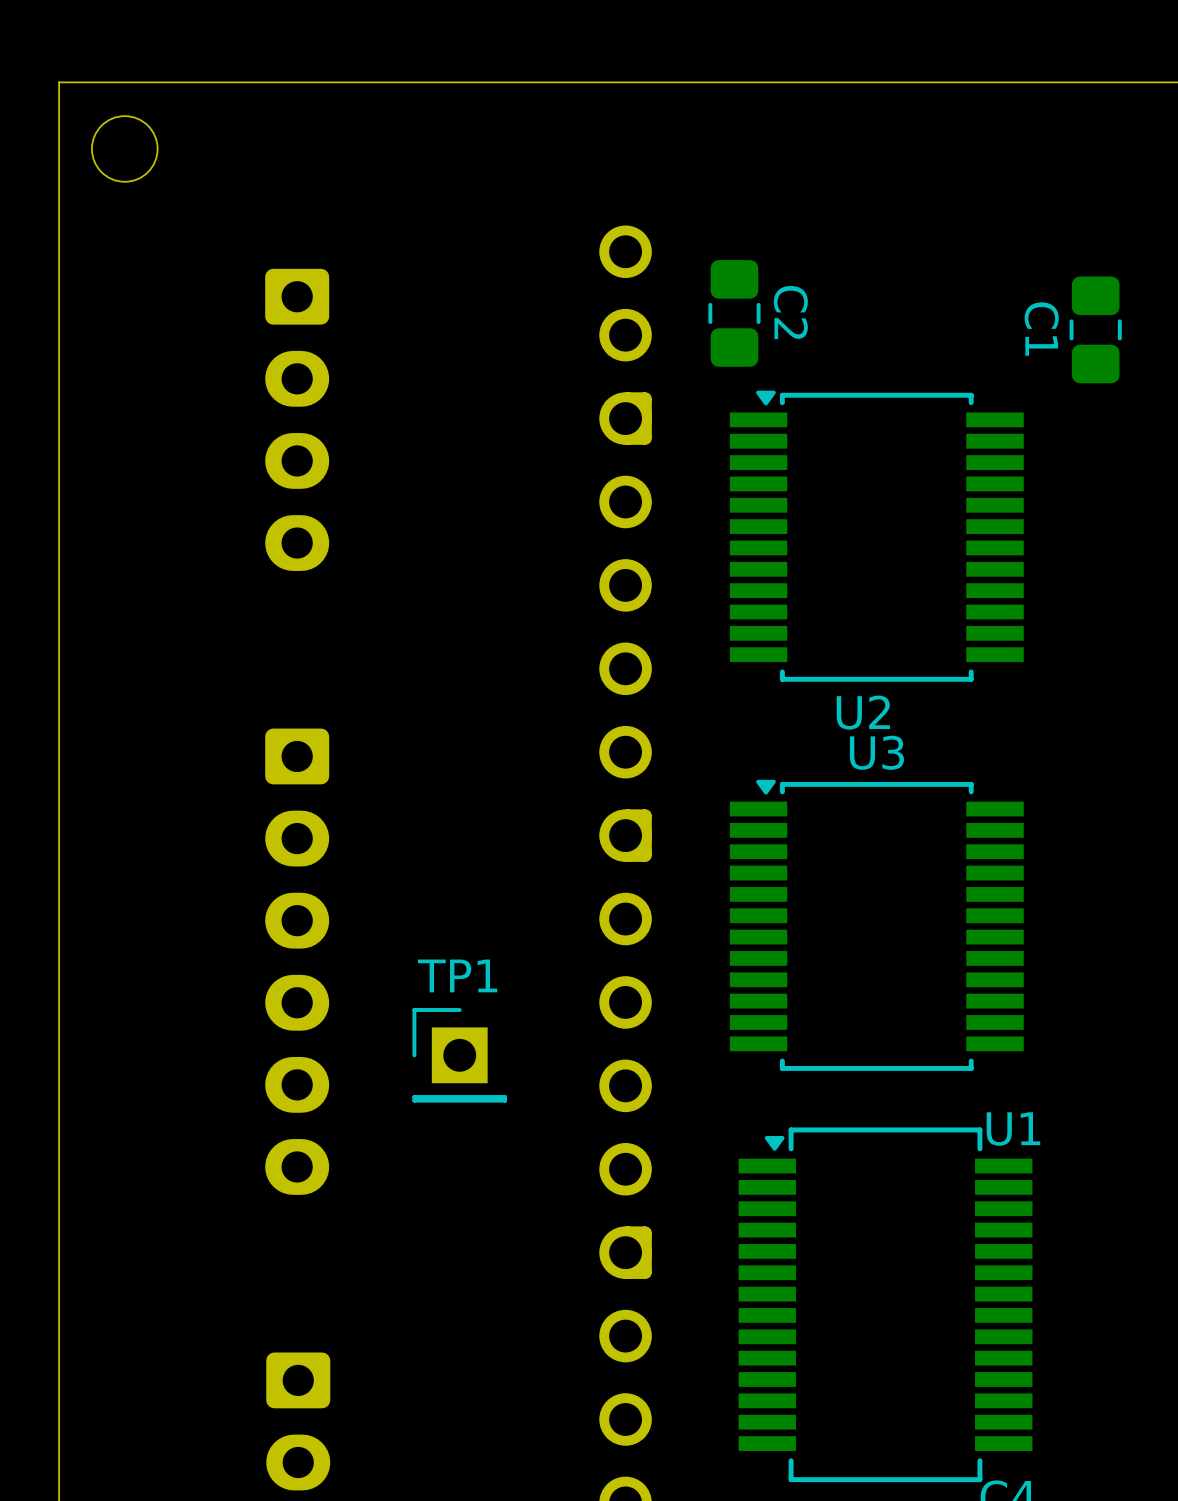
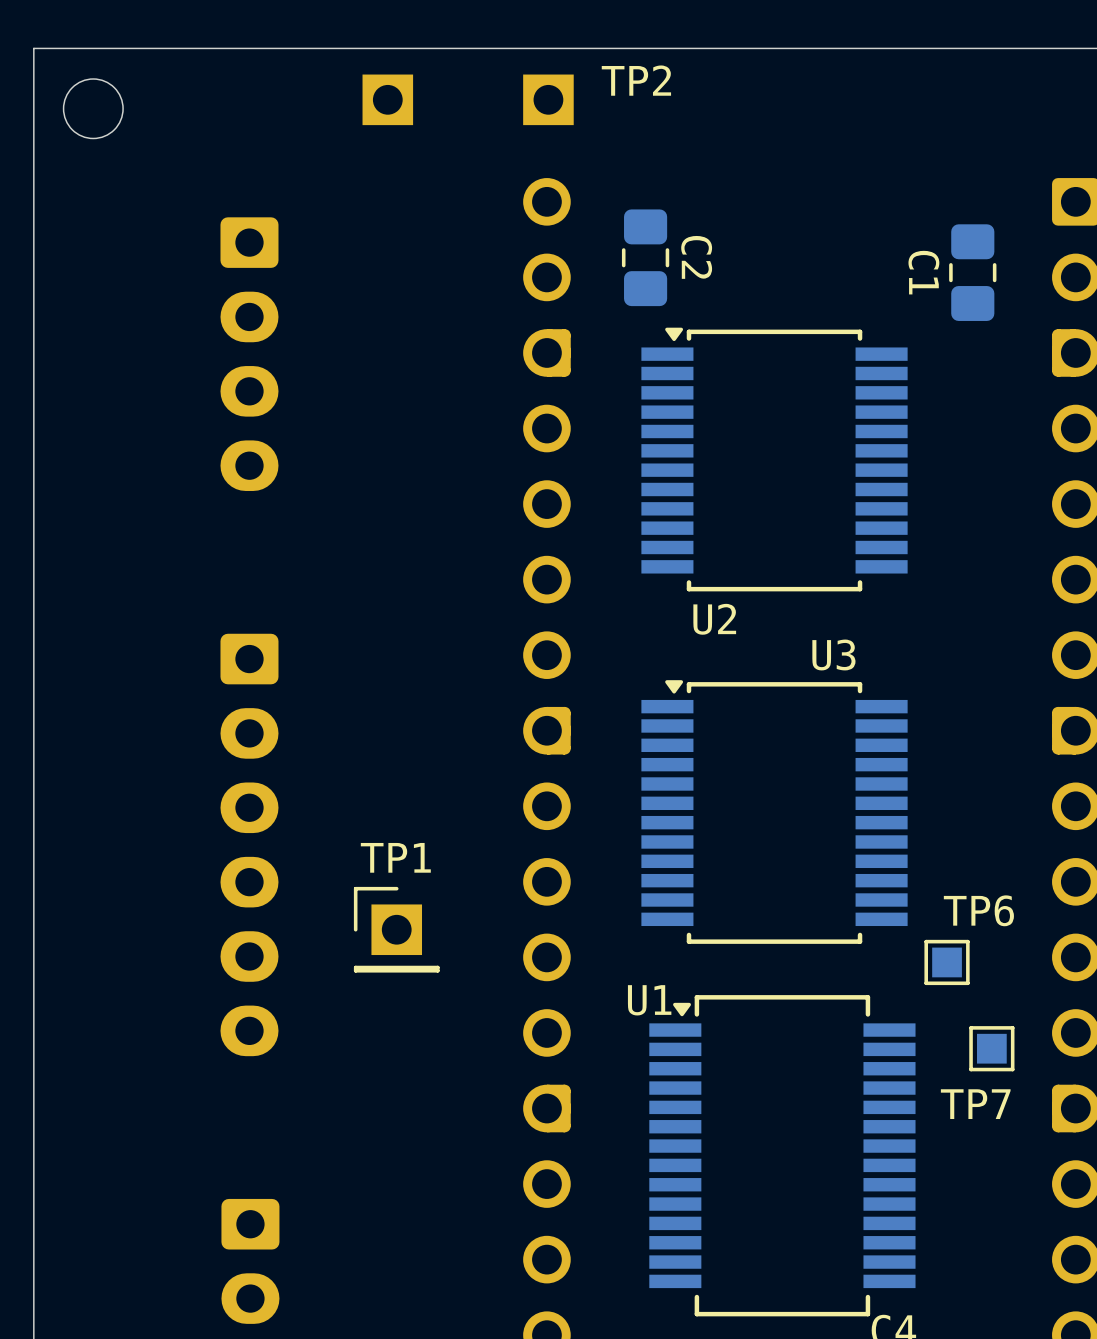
part: none -> (387, 99)
TP2: none -> (548, 99)
U2 name position: U2 (863, 712) -> U2 (714, 619)
U3 name position: U3 (876, 752) -> U3 (833, 654)
TP6: none -> (947, 962)
U1 name position: U1 (1013, 1129) -> U1 (649, 1000)
TP7: none -> (991, 1048)

